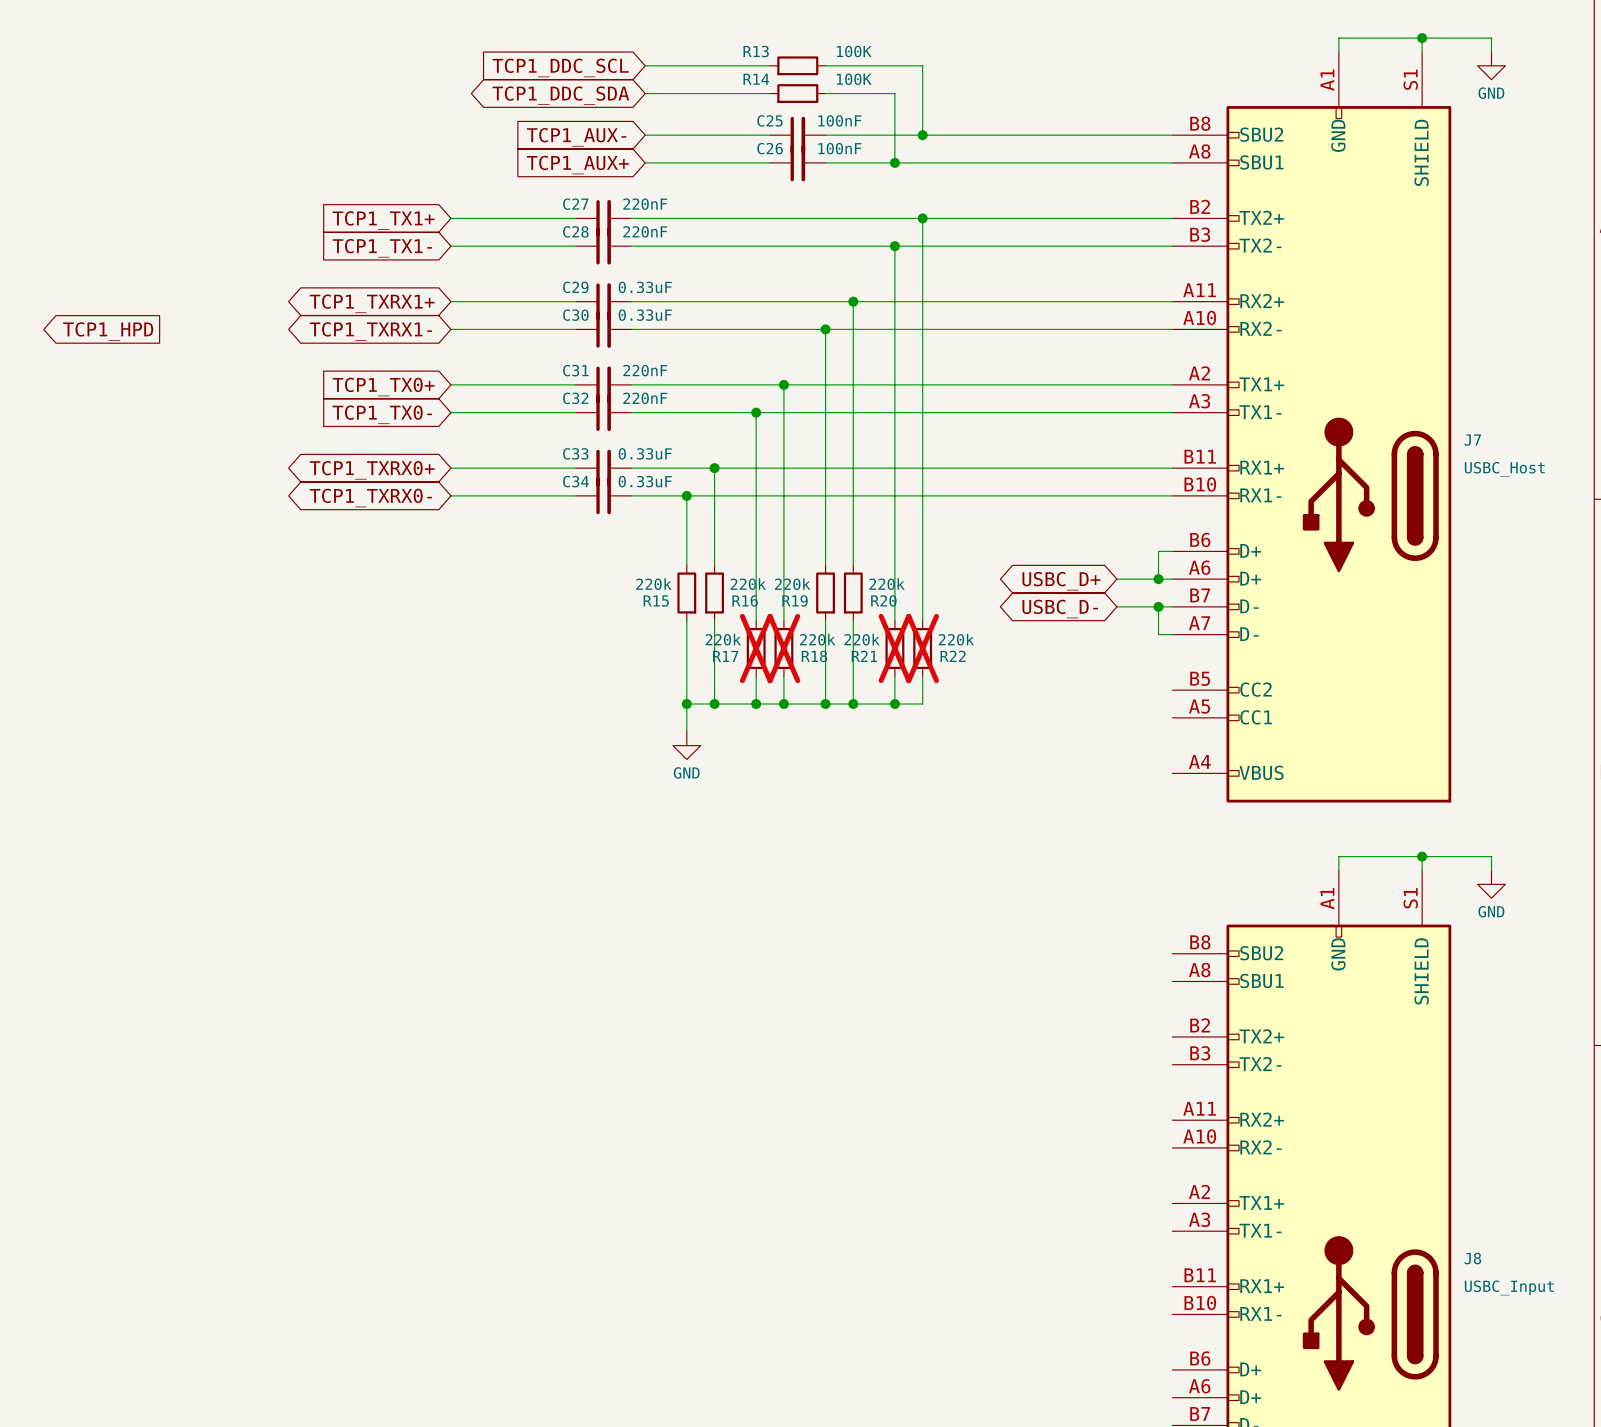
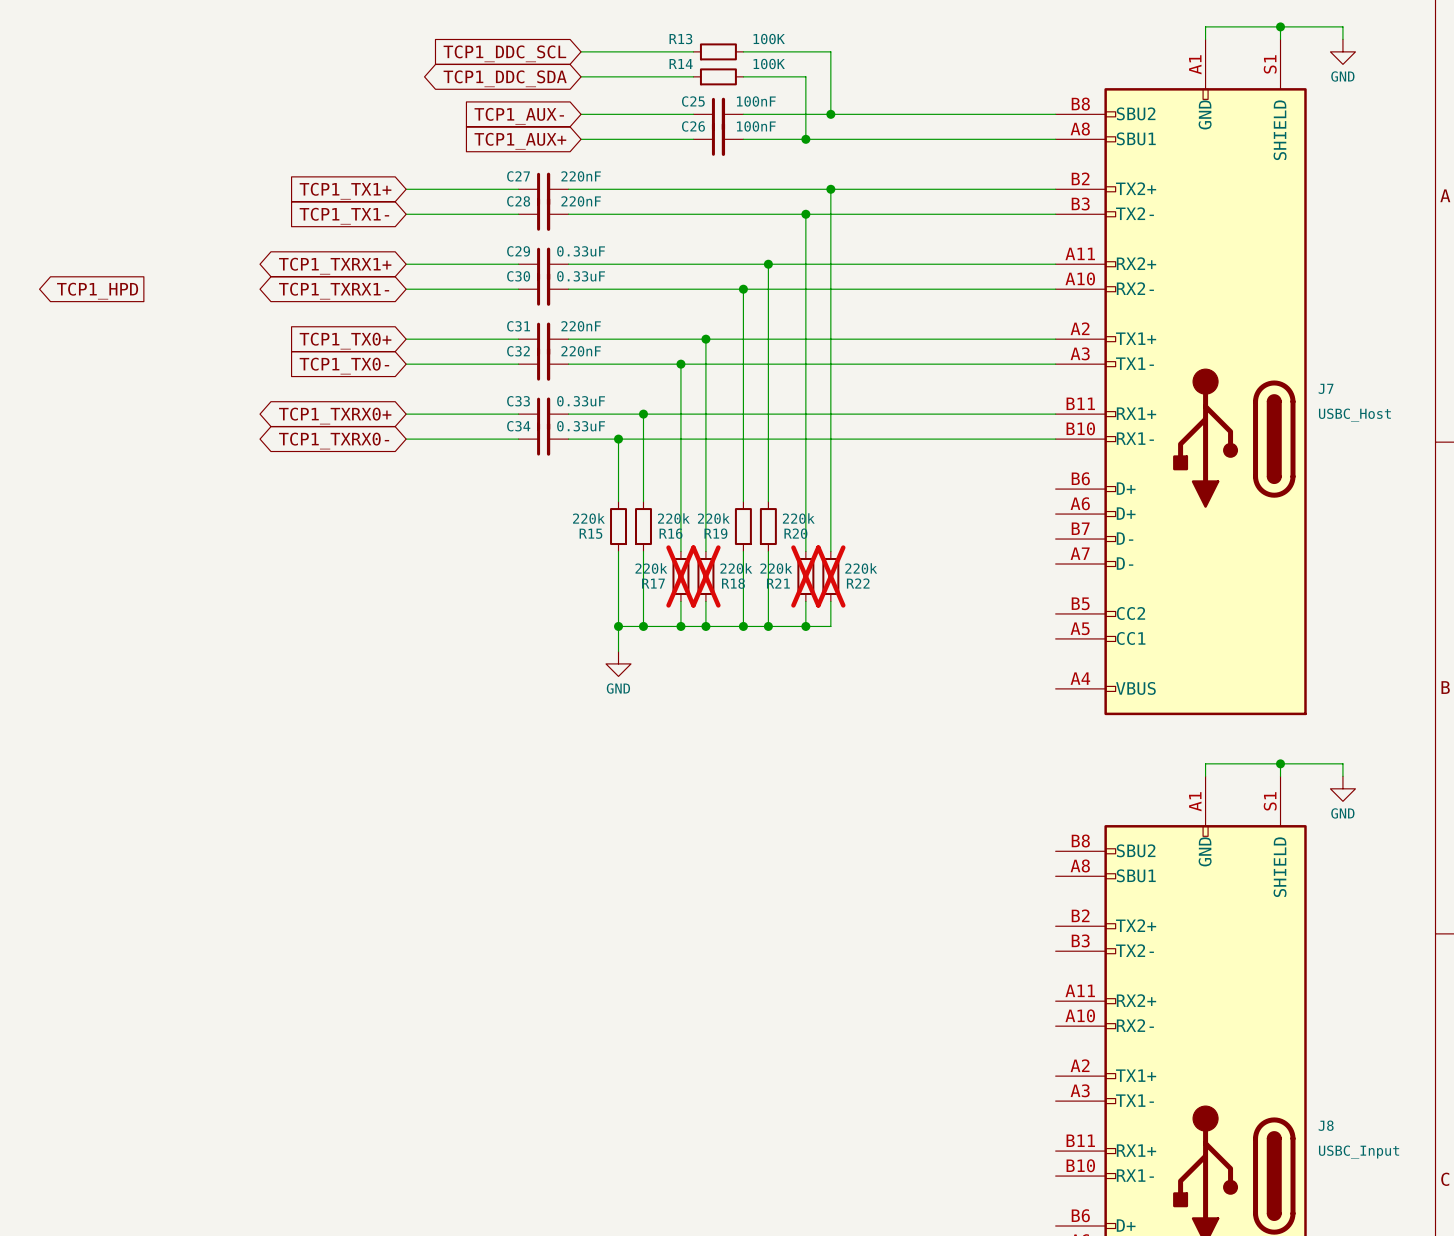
wire: (1172, 551) (1158, 551) (1158, 579) -> none
wire: (1116, 579) (1172, 579) -> none
junction: (1158, 579) -> none
global label: USBC_D+ (1061, 581) -> none
wire: (1116, 606) (1172, 606) -> none
wire: (1158, 606) (1158, 634) (1172, 634) -> none
junction: (1158, 606) -> none
global label: USBC_D- (1060, 609) -> none

